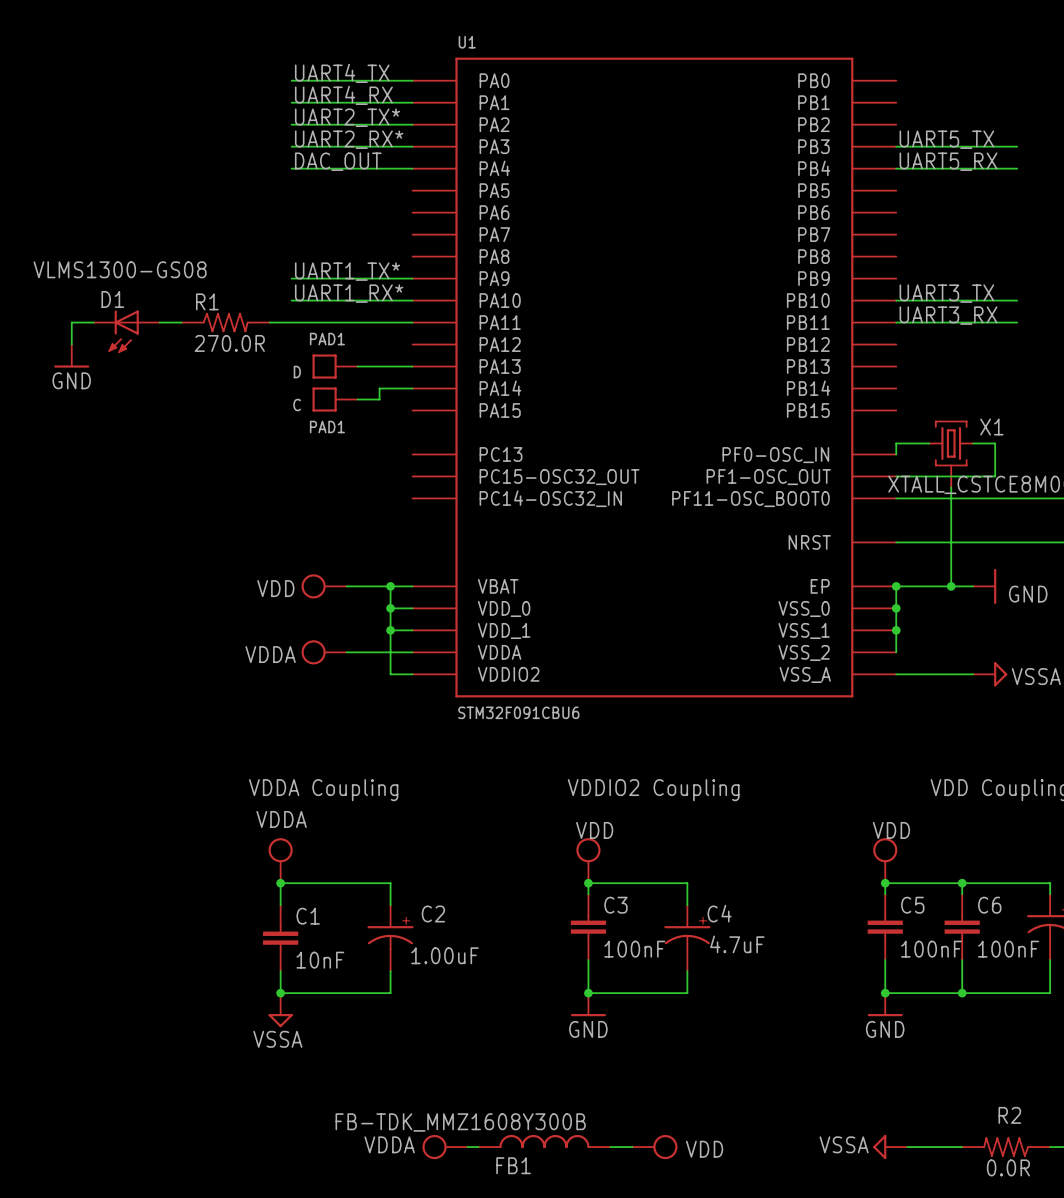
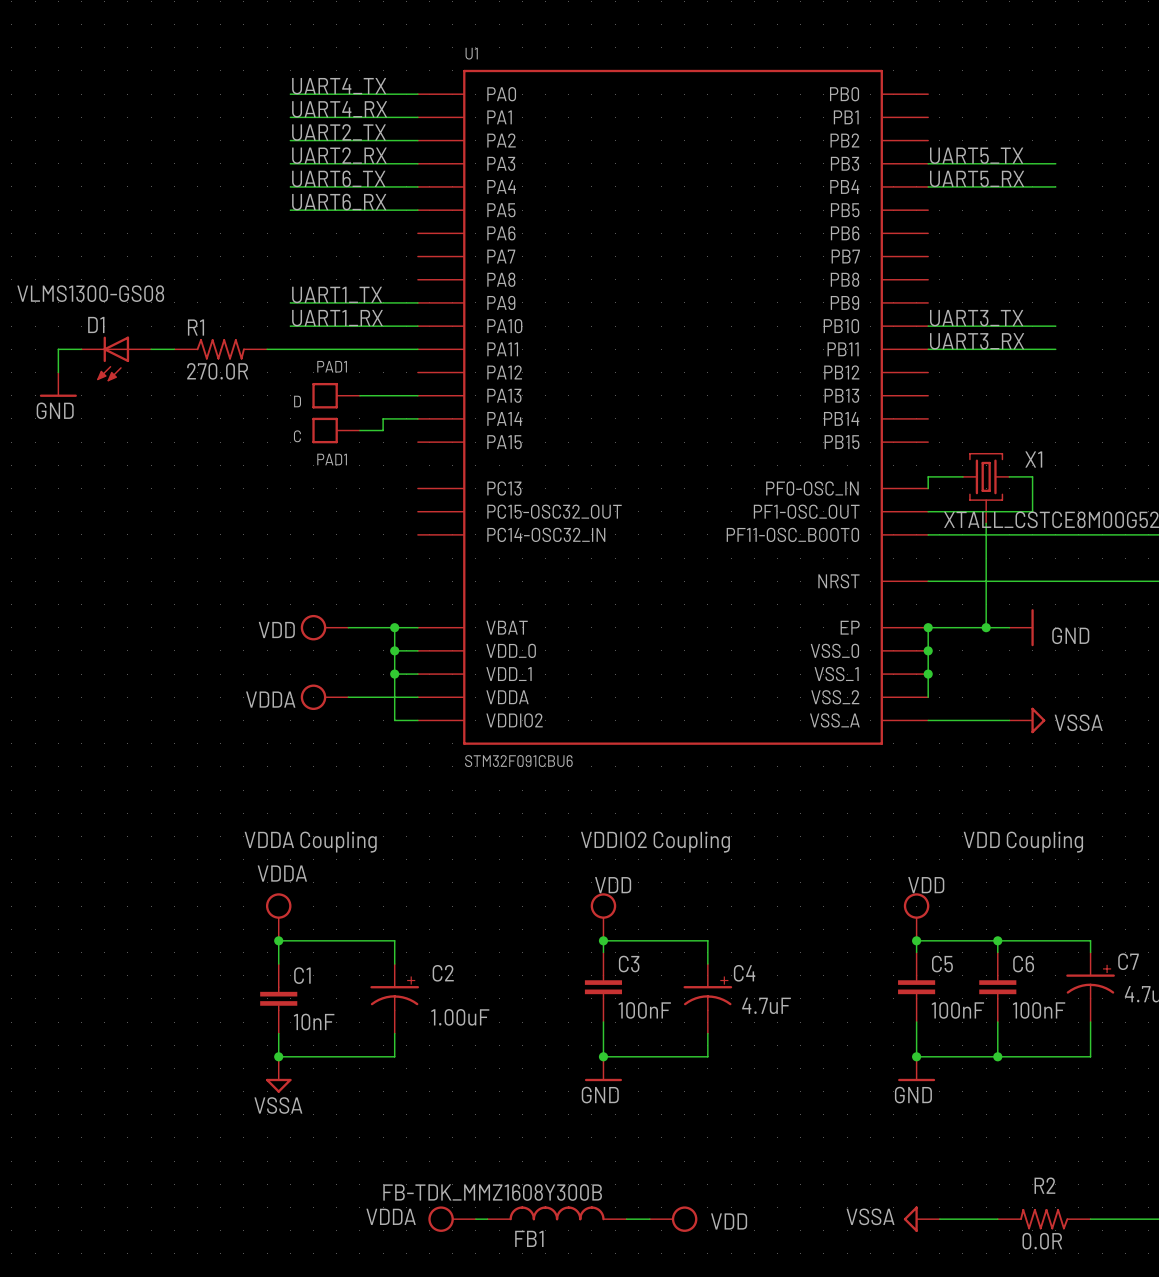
label: UART2_TX* (347, 117) -> UART2_TX (338, 132)
label: UART2_RX* (349, 139) -> UART2_RX (339, 155)
label: DAC_OUT (338, 161) -> UART6_TX (338, 178)
label: none -> UART6_RX (339, 202)
wire: none -> (290, 210) (417, 210)
label: UART1_TX* (347, 271) -> UART1_TX (337, 294)
label: UART1_RX* (349, 293) -> UART1_RX (337, 318)

